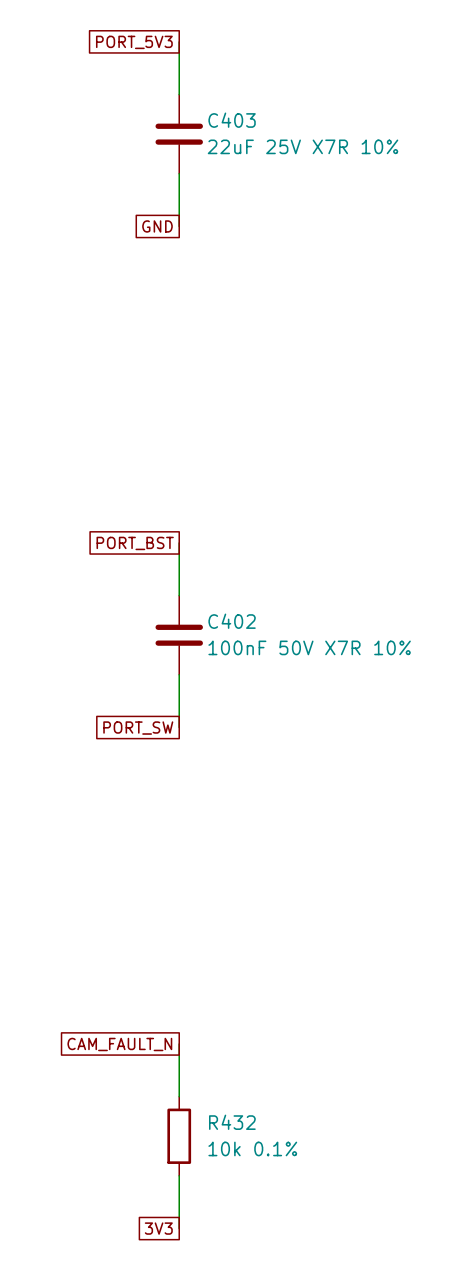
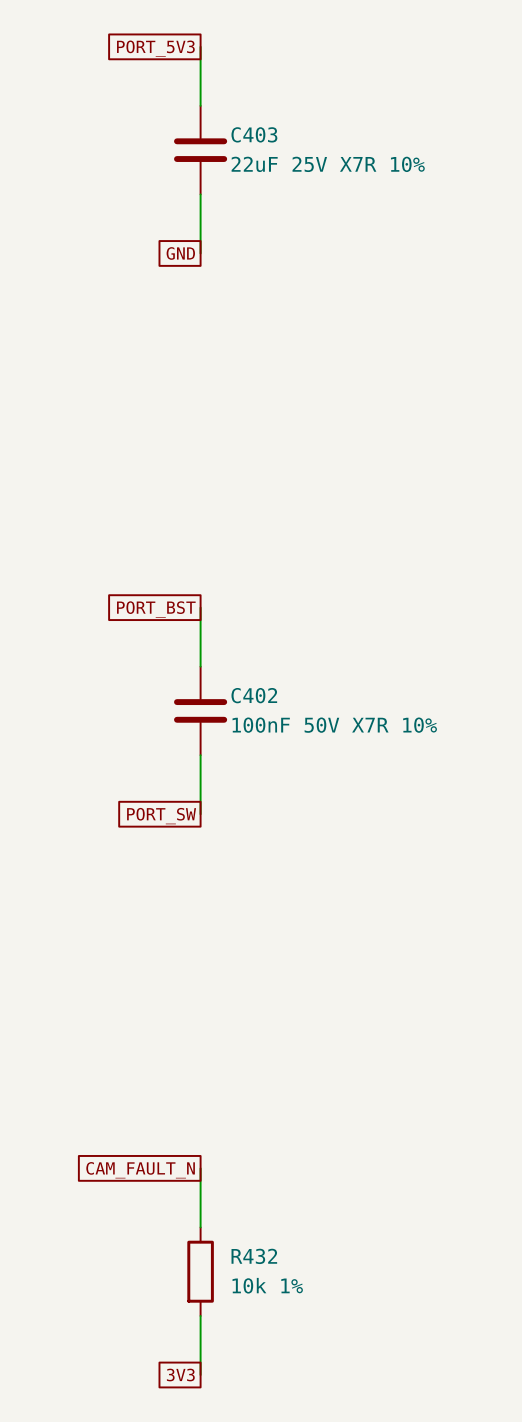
R432 value: 10k 0.1% (252, 1148) -> 10k 1% (267, 1285)

